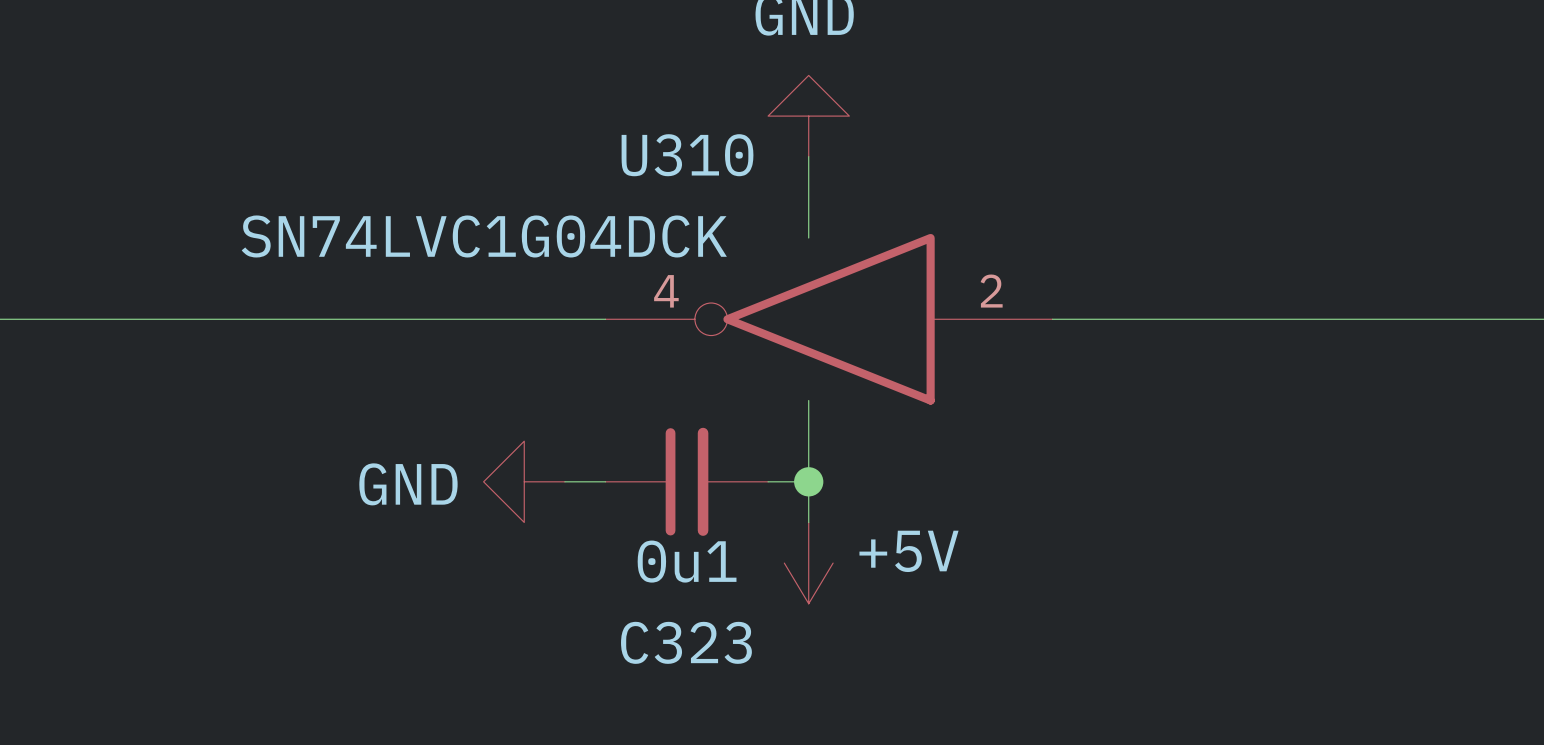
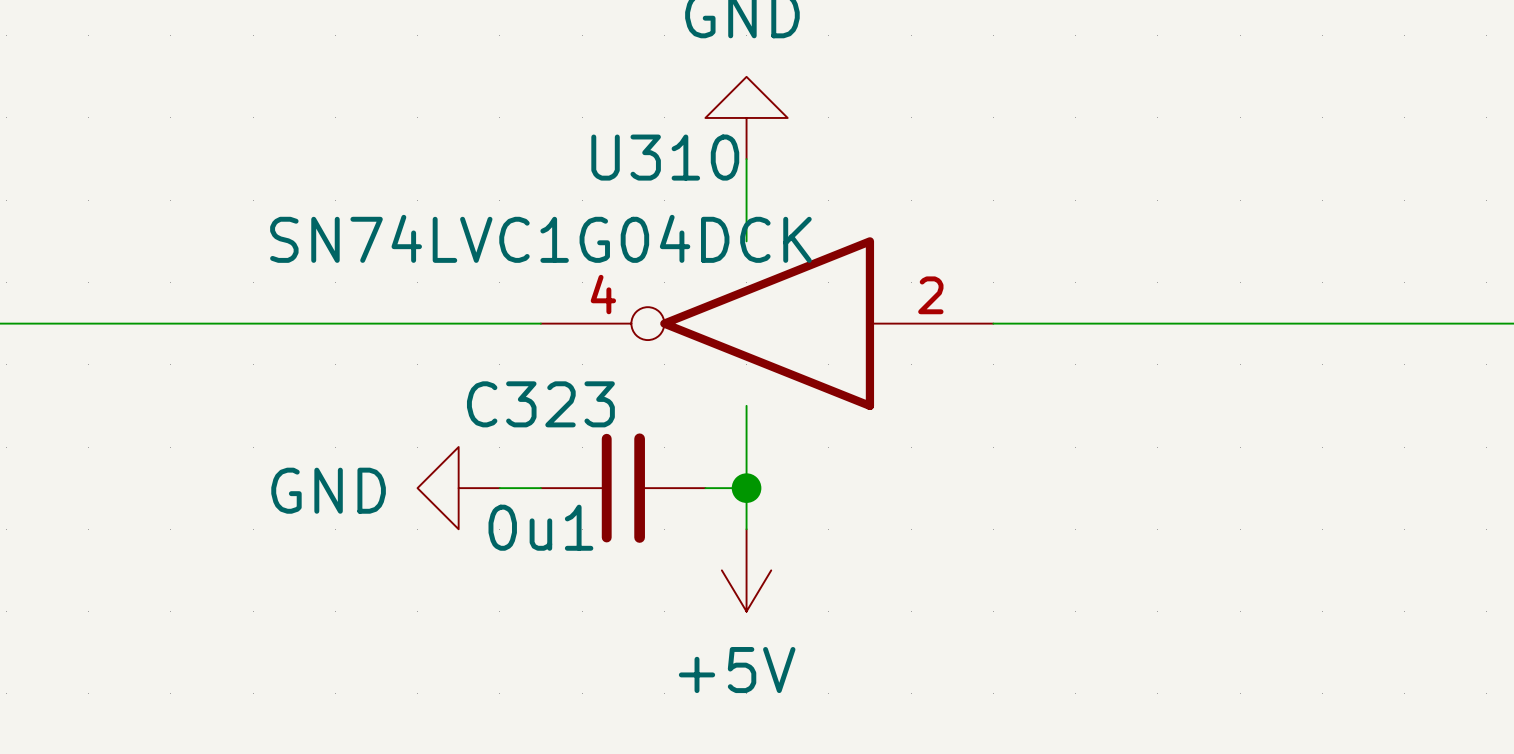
U310 name position: U310 (687, 155) -> U310 (665, 157)
U310 value position: SN74LVC1G04DCK (484, 236) -> SN74LVC1G04DCK (540, 238)
power symbol text position: +5V (909, 551) -> +5V (737, 670)
C323 value position: 0u1 (687, 561) -> 0u1 (540, 527)
C323 name position: C323 (686, 642) -> C323 (540, 404)

